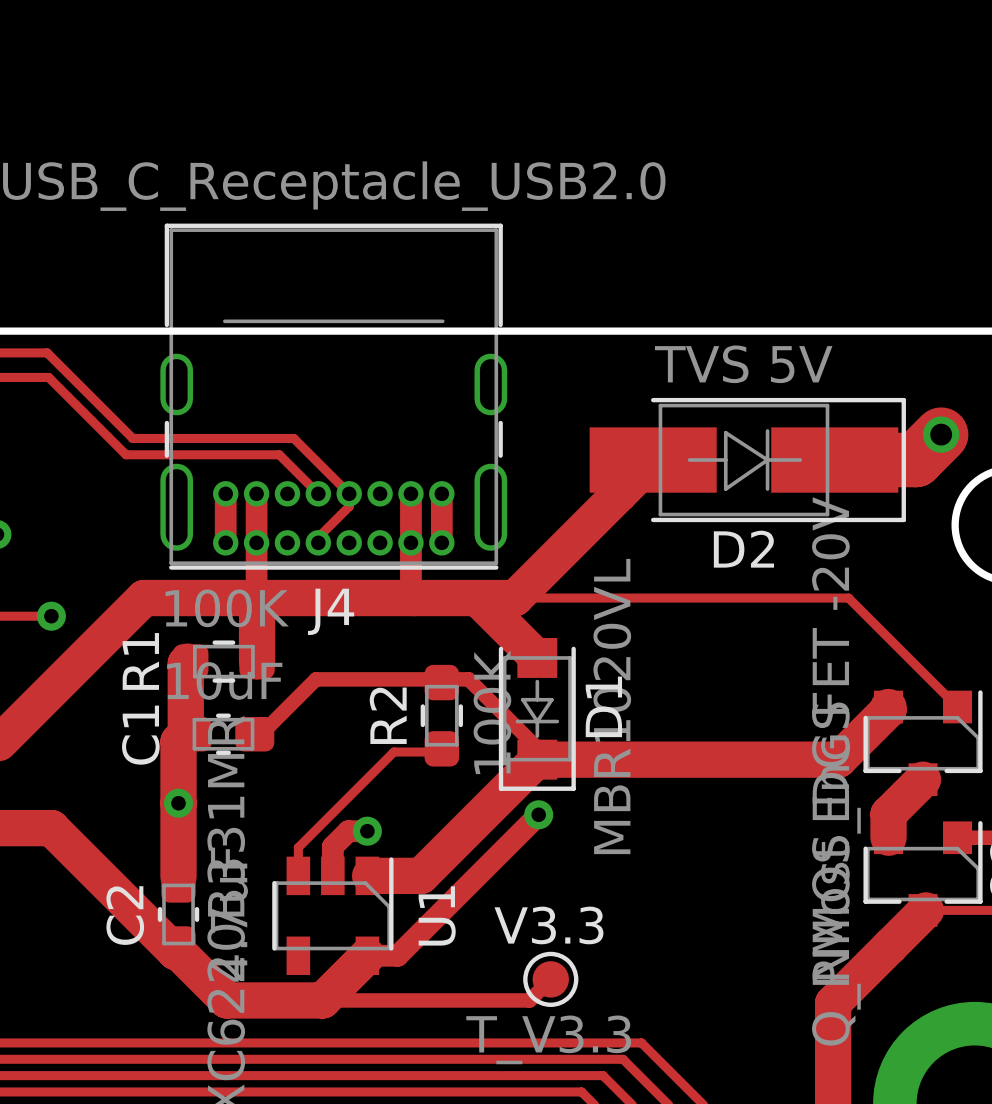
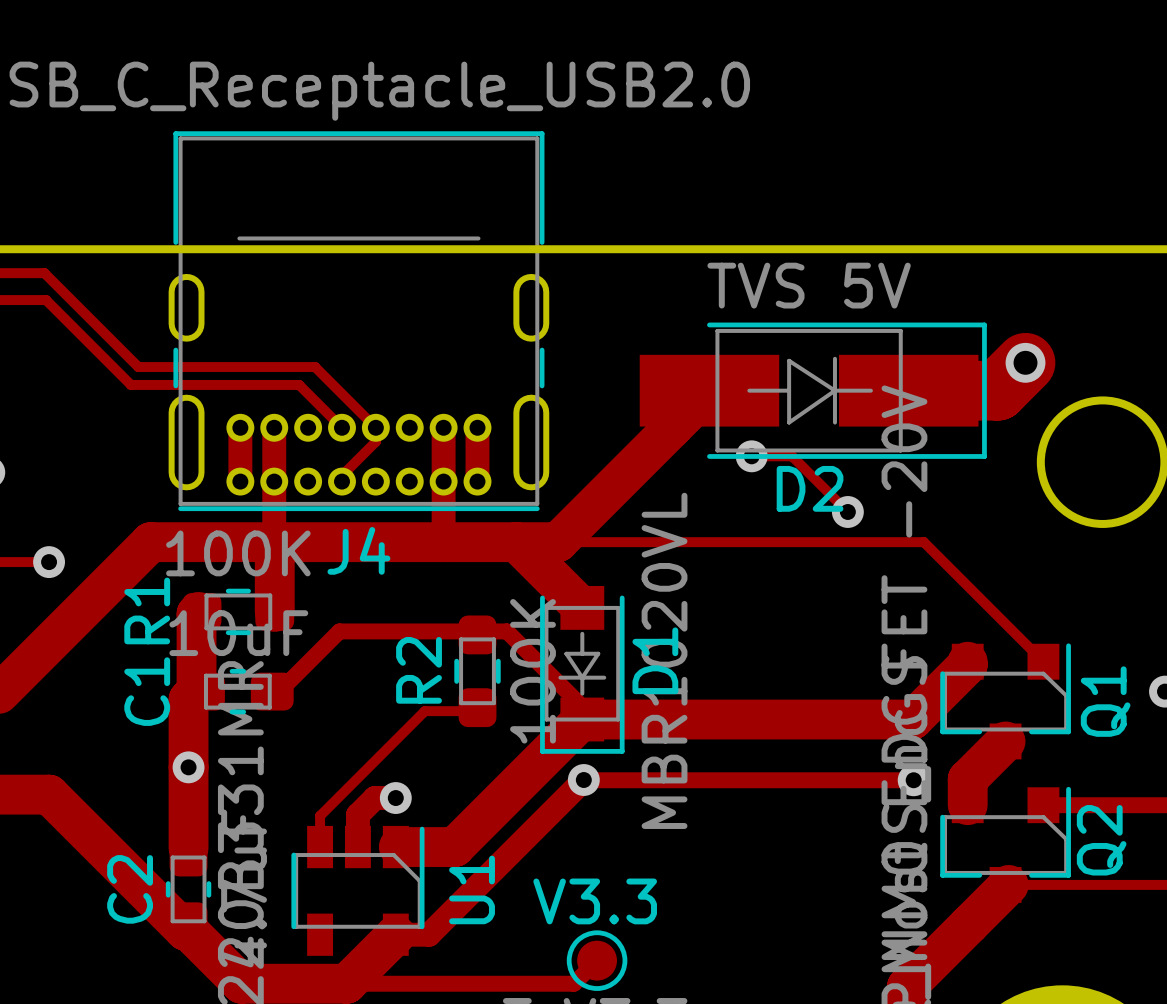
track: none -> (751, 456) (792, 456) (847, 511)
via: none -> (751, 456)
via: none -> (847, 511)
track: none -> (584, 780) (913, 780)
via: none -> (913, 780)

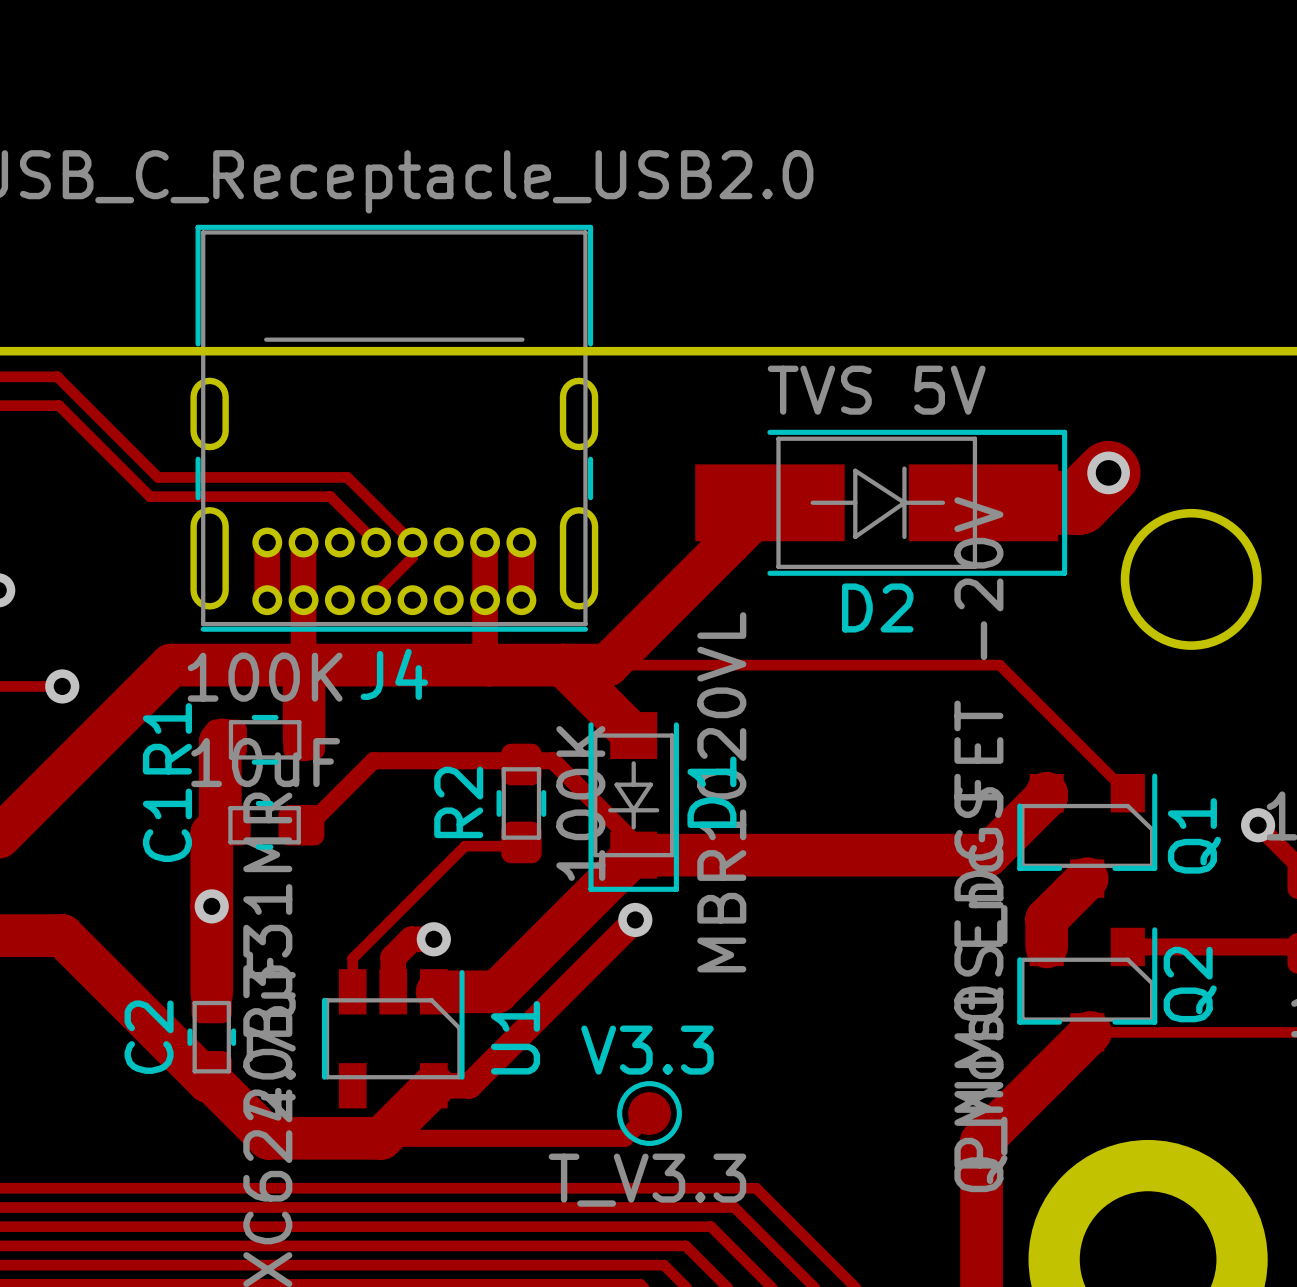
track: (751, 456) (792, 456) (847, 511) -> none
via: (751, 456) -> none
via: (847, 511) -> none
track: (584, 780) (913, 780) -> none
via: (913, 780) -> none

